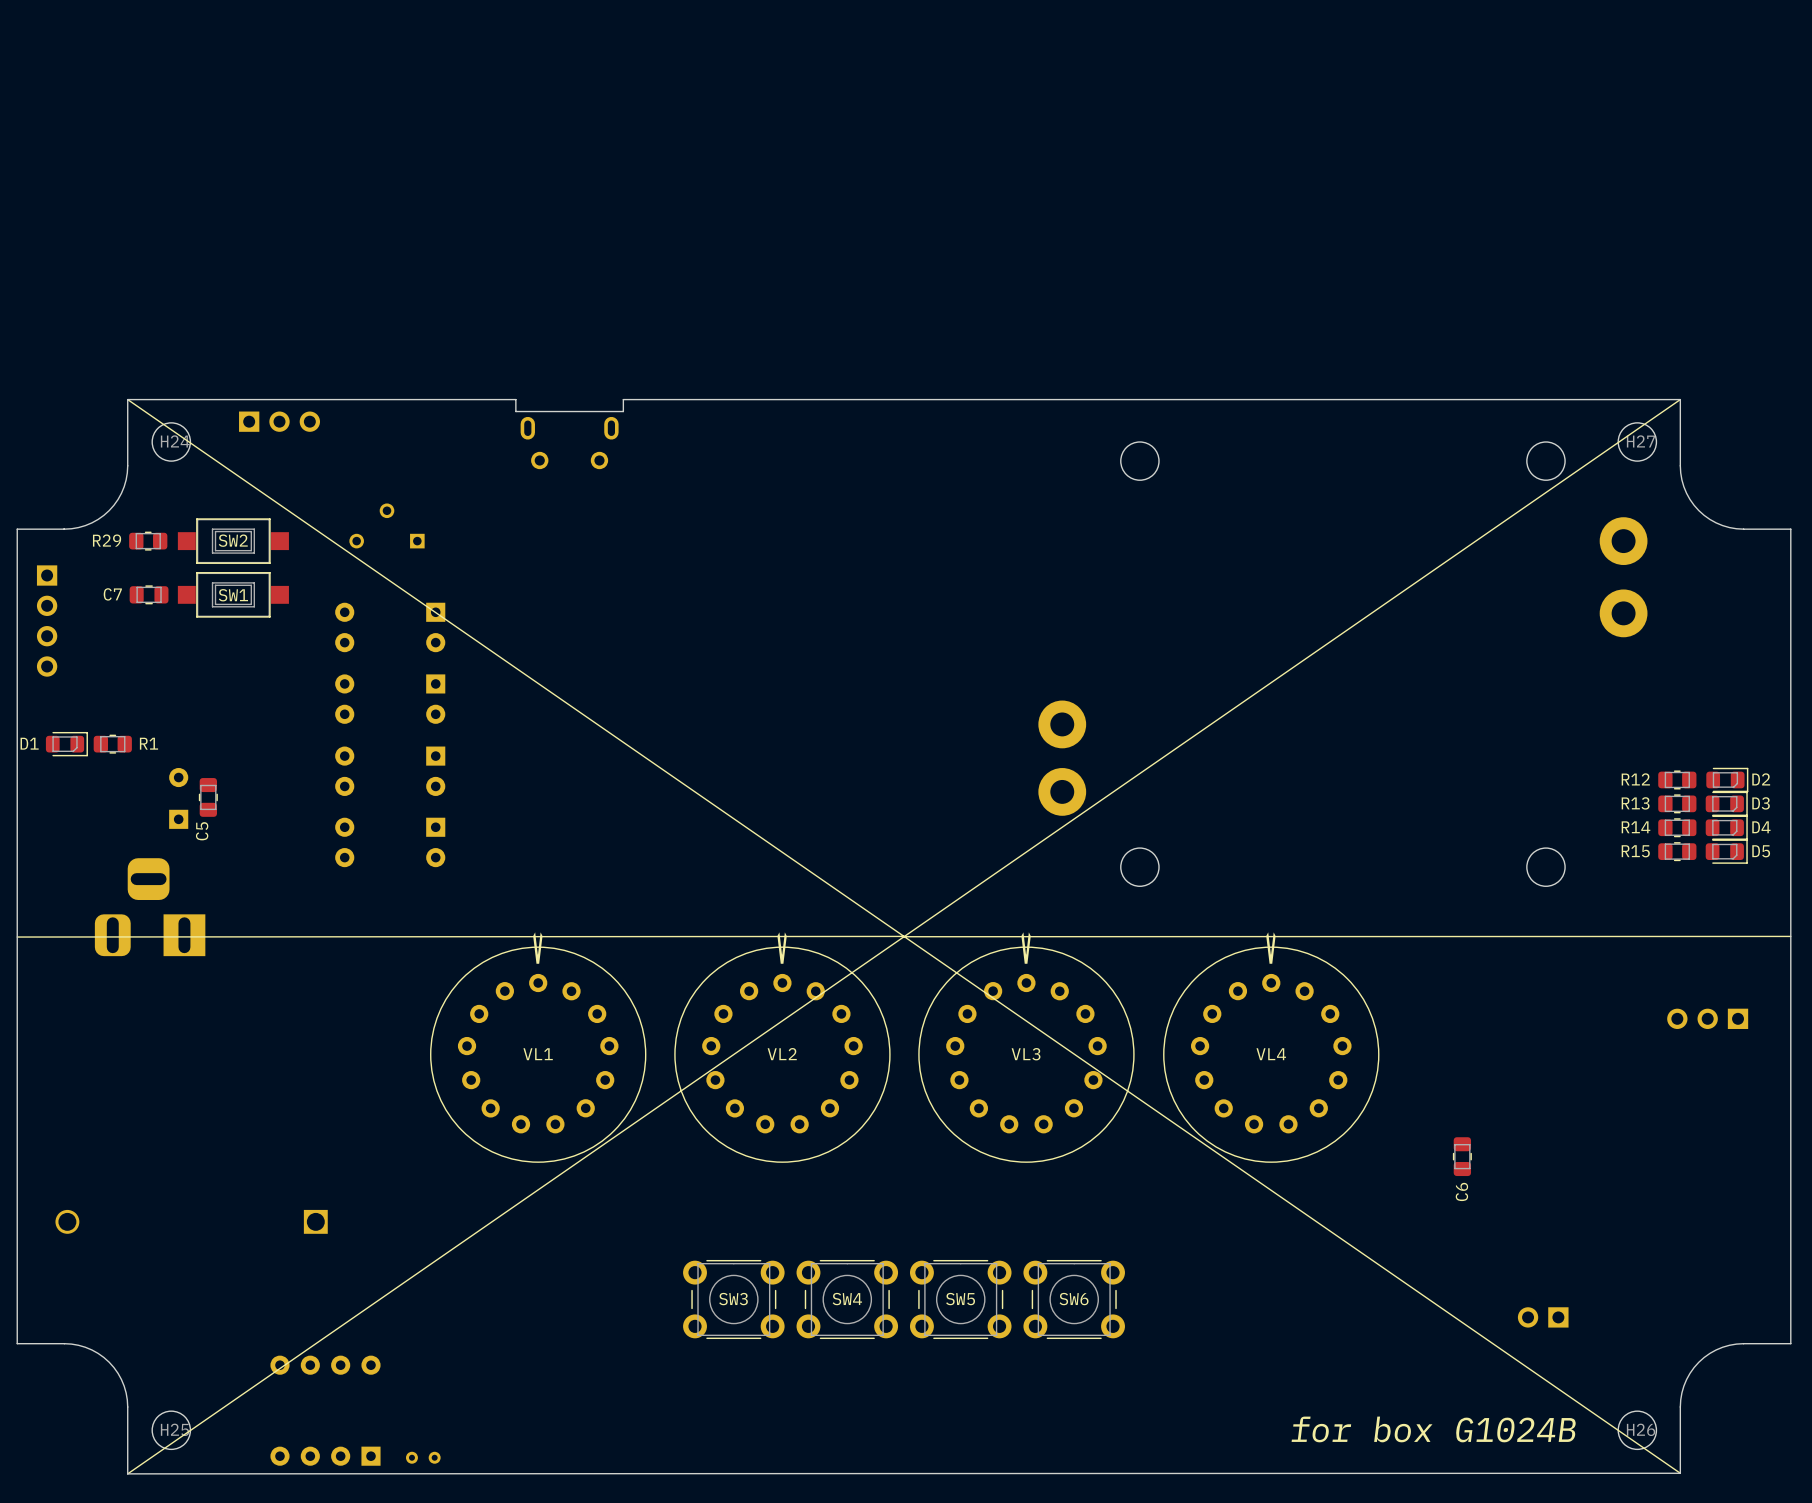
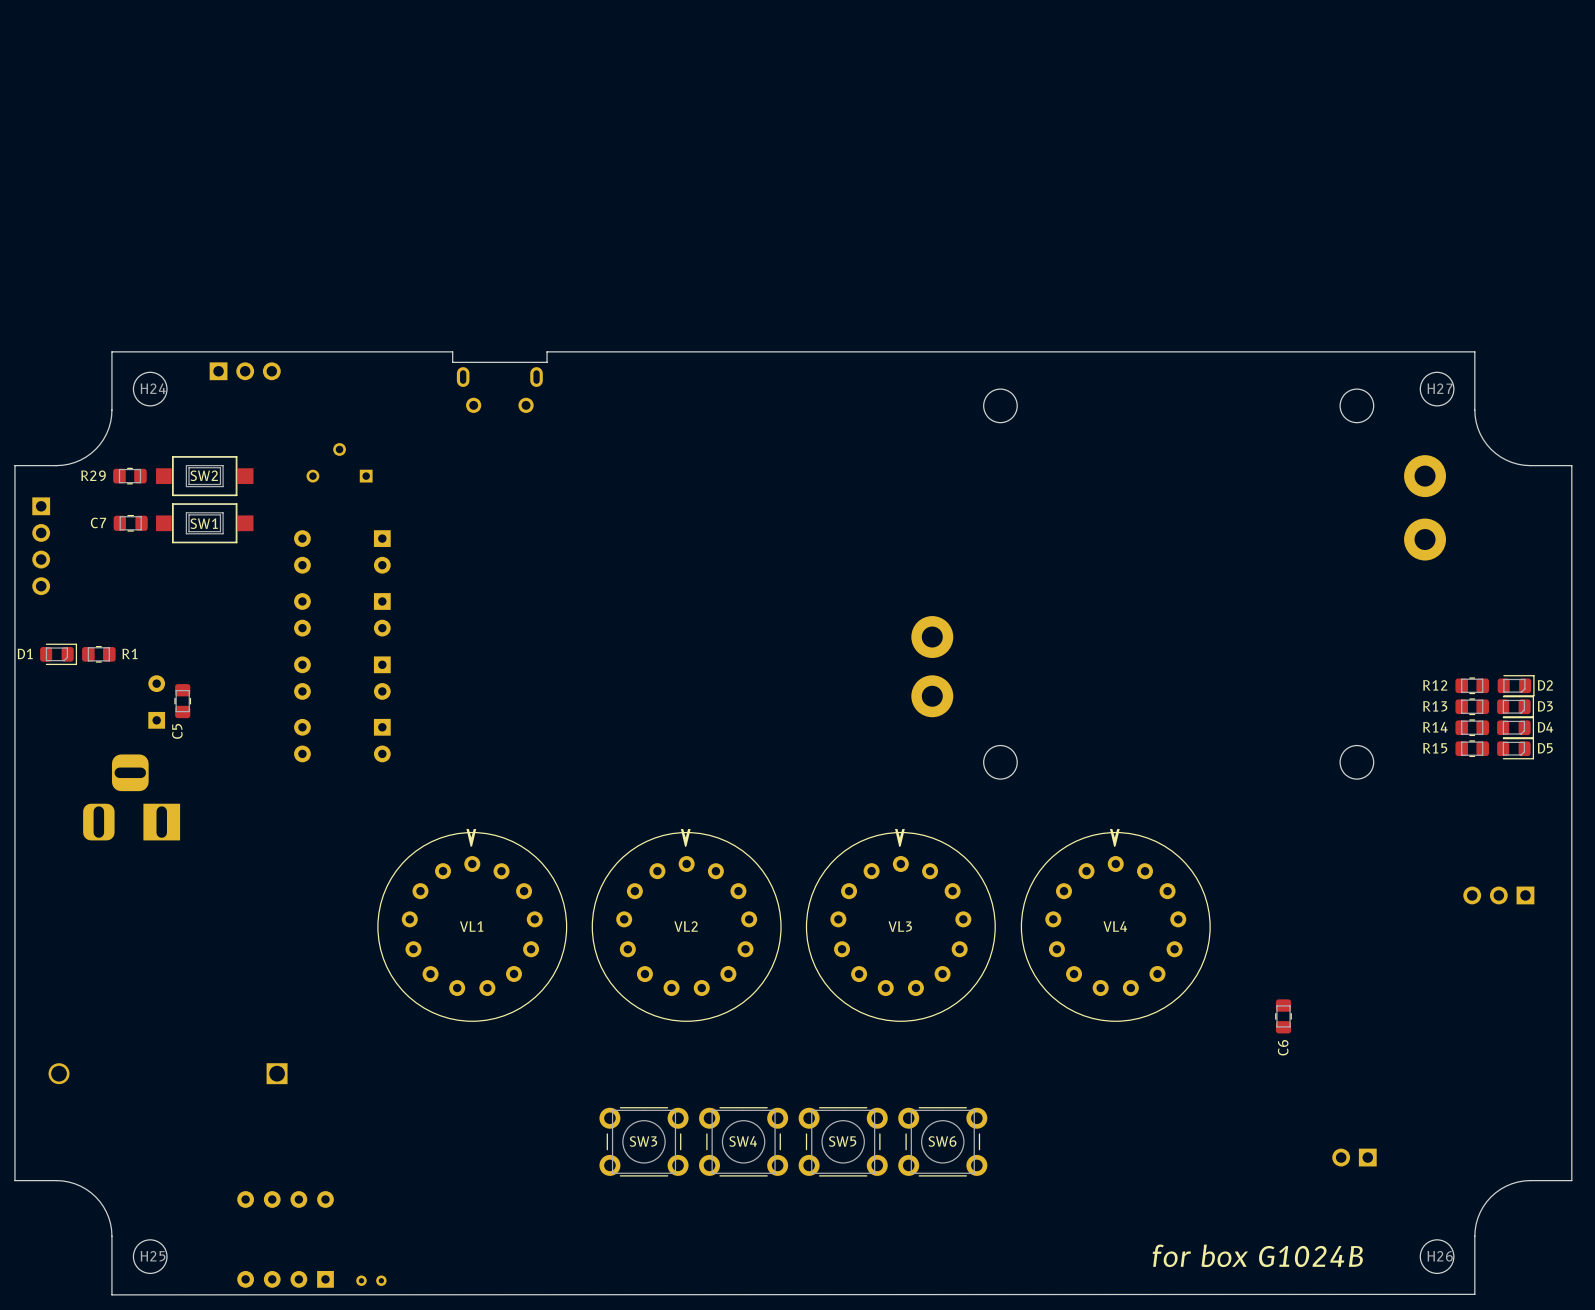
line: (127, 399) (1680, 1473) -> none
line: (1680, 399) (127, 1473) -> none
line: (904, 936) (17, 937) -> none
line: (1790, 936) (904, 936) -> none

